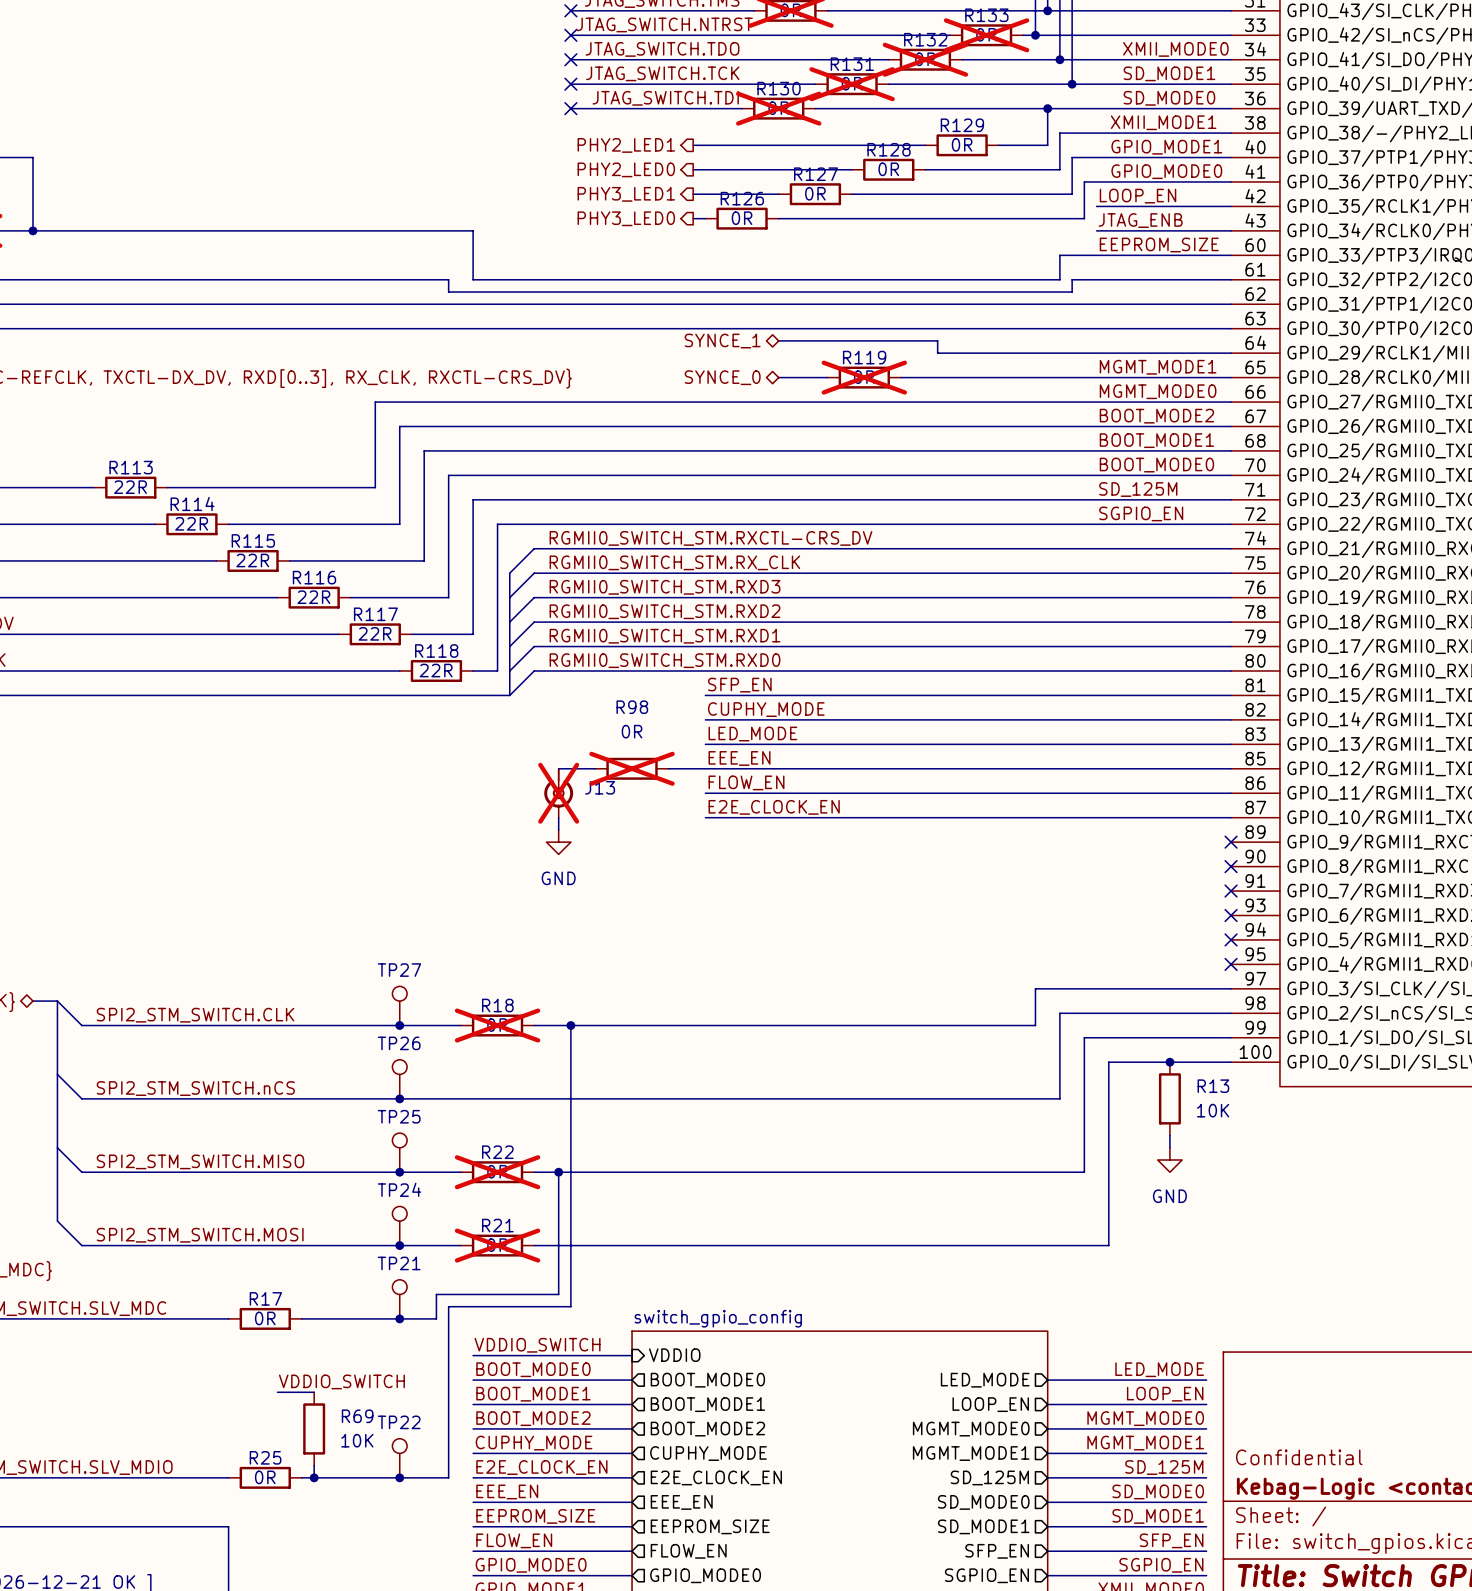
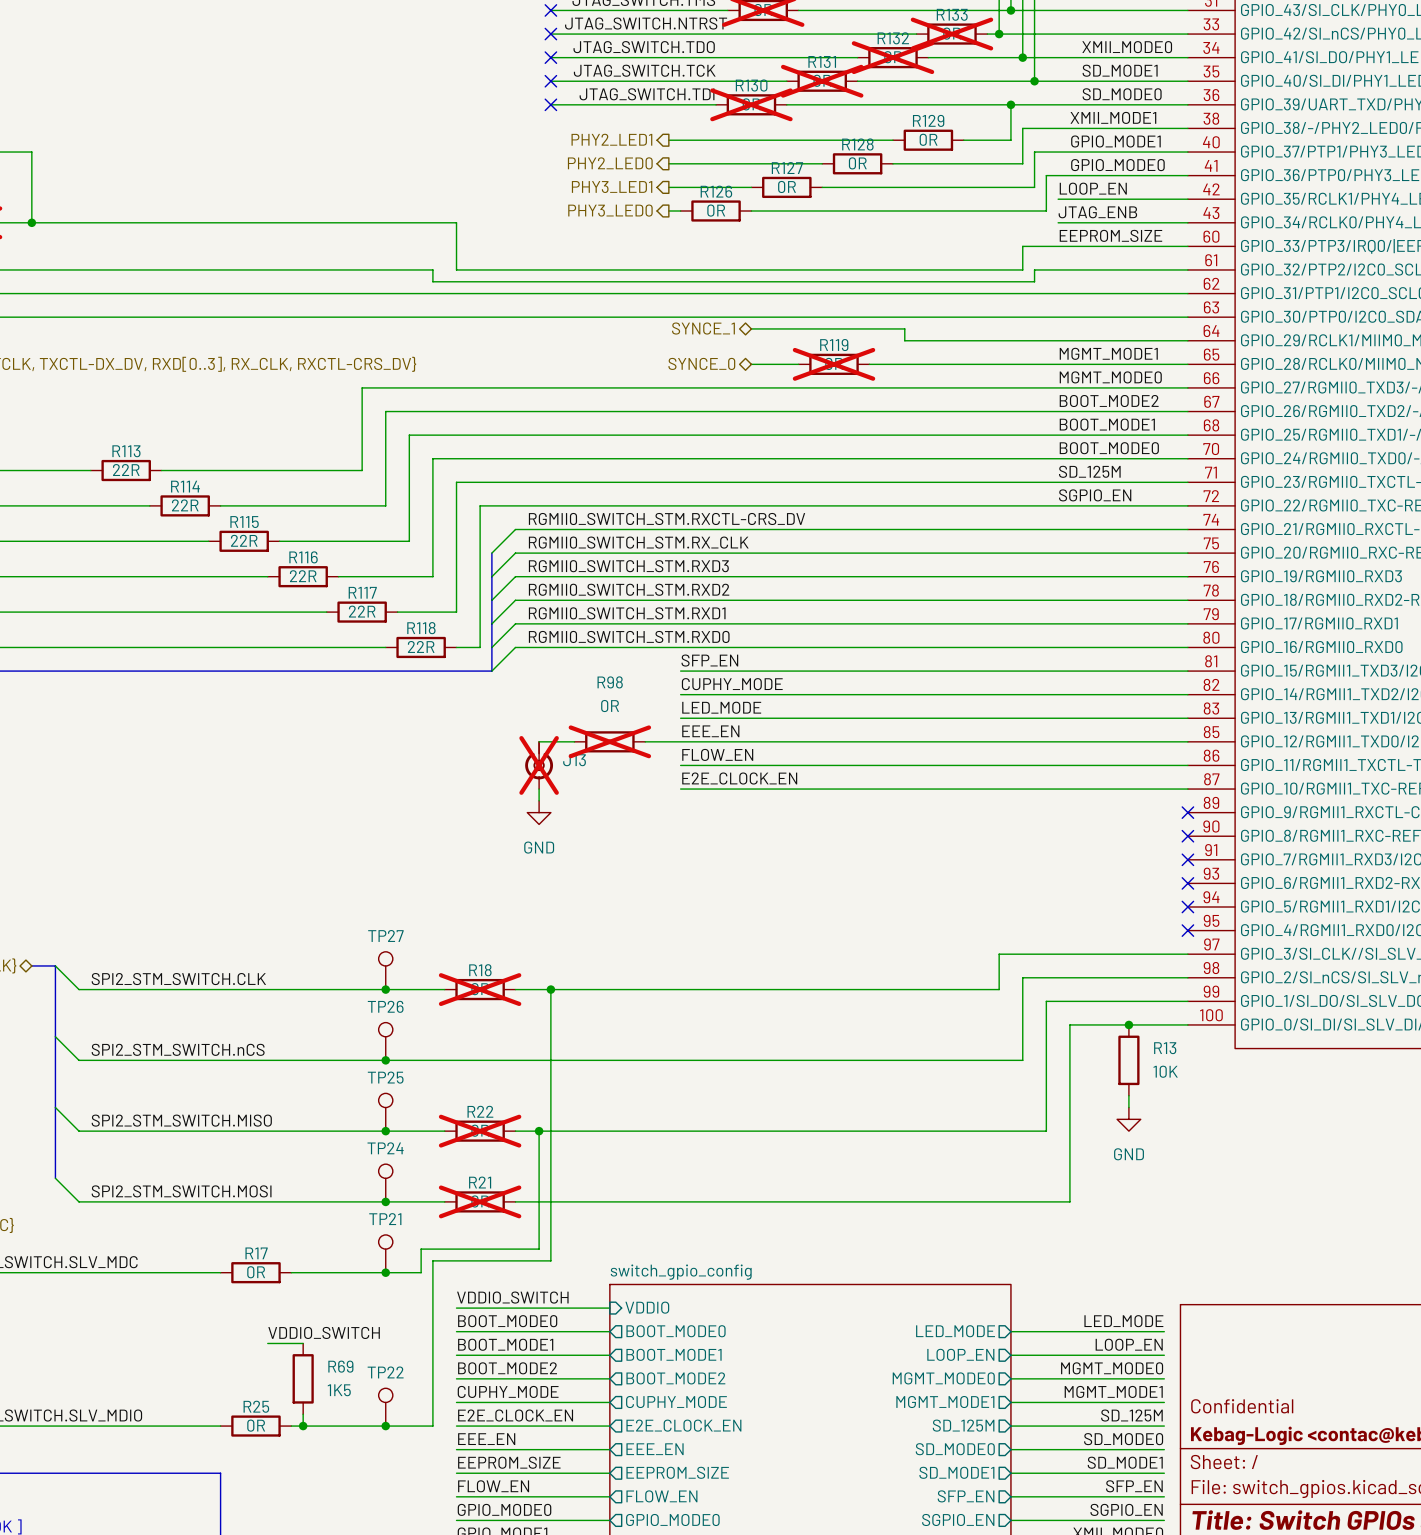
R69 value: 10K (357, 1440) -> 1K5 (339, 1390)

